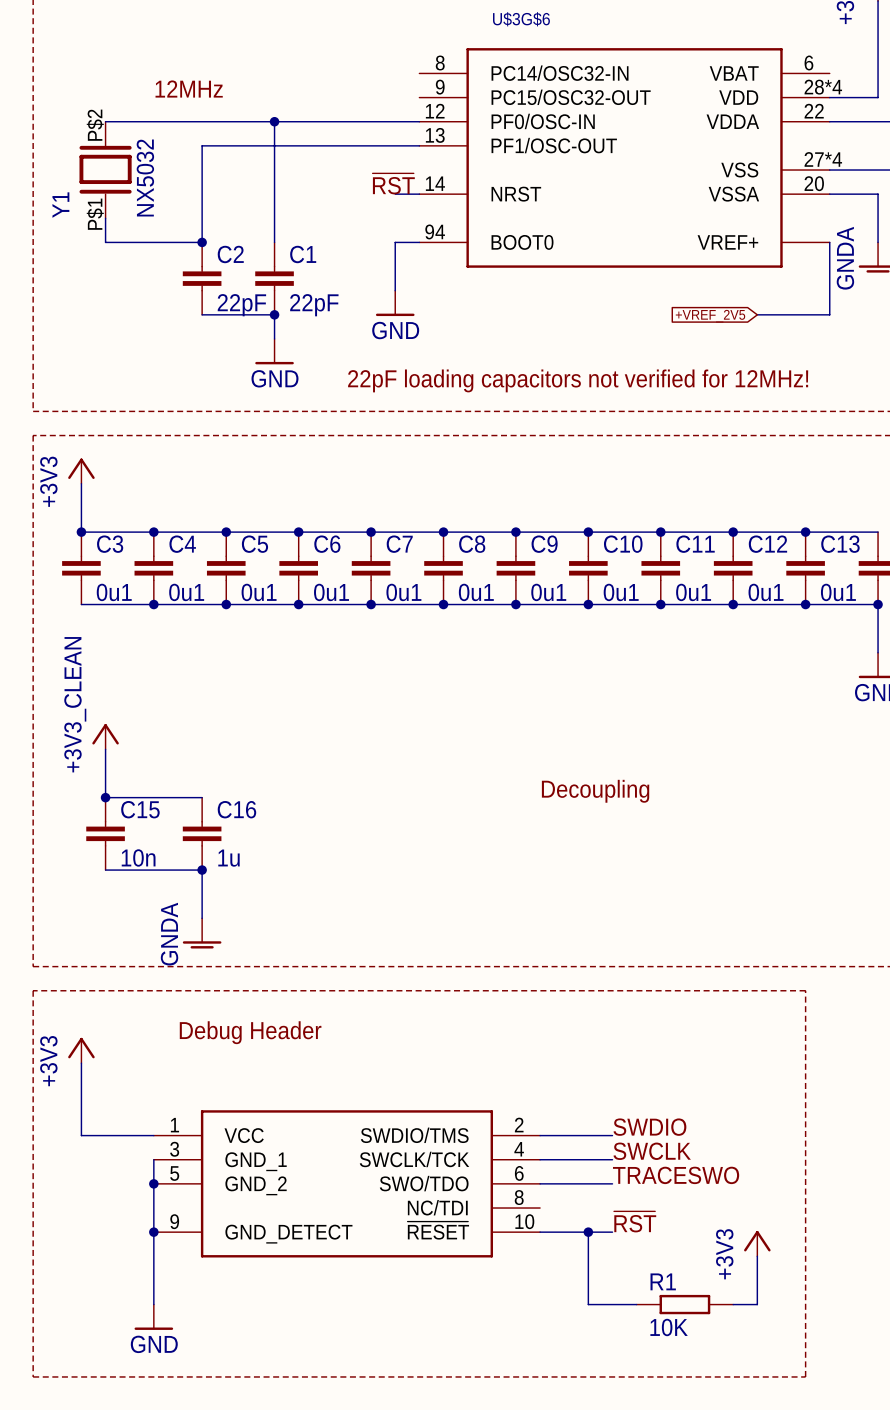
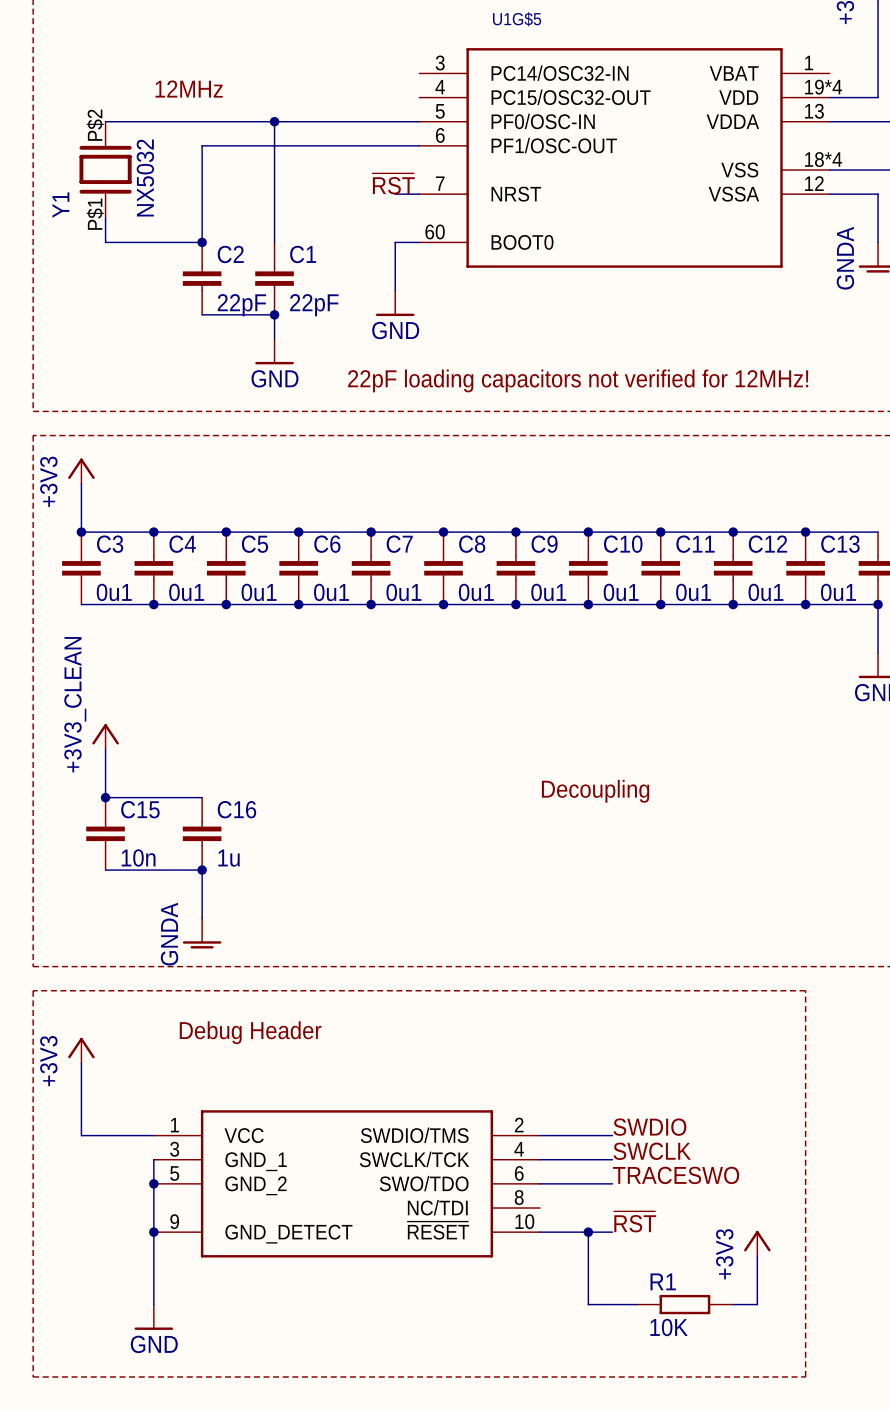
U$3G$6: (624, 157) -> none
U1G$5: none -> (624, 157)
wire: (829, 242) (829, 314) (757, 314) -> none
global label: +VREF_2V5 (710, 316) -> none

